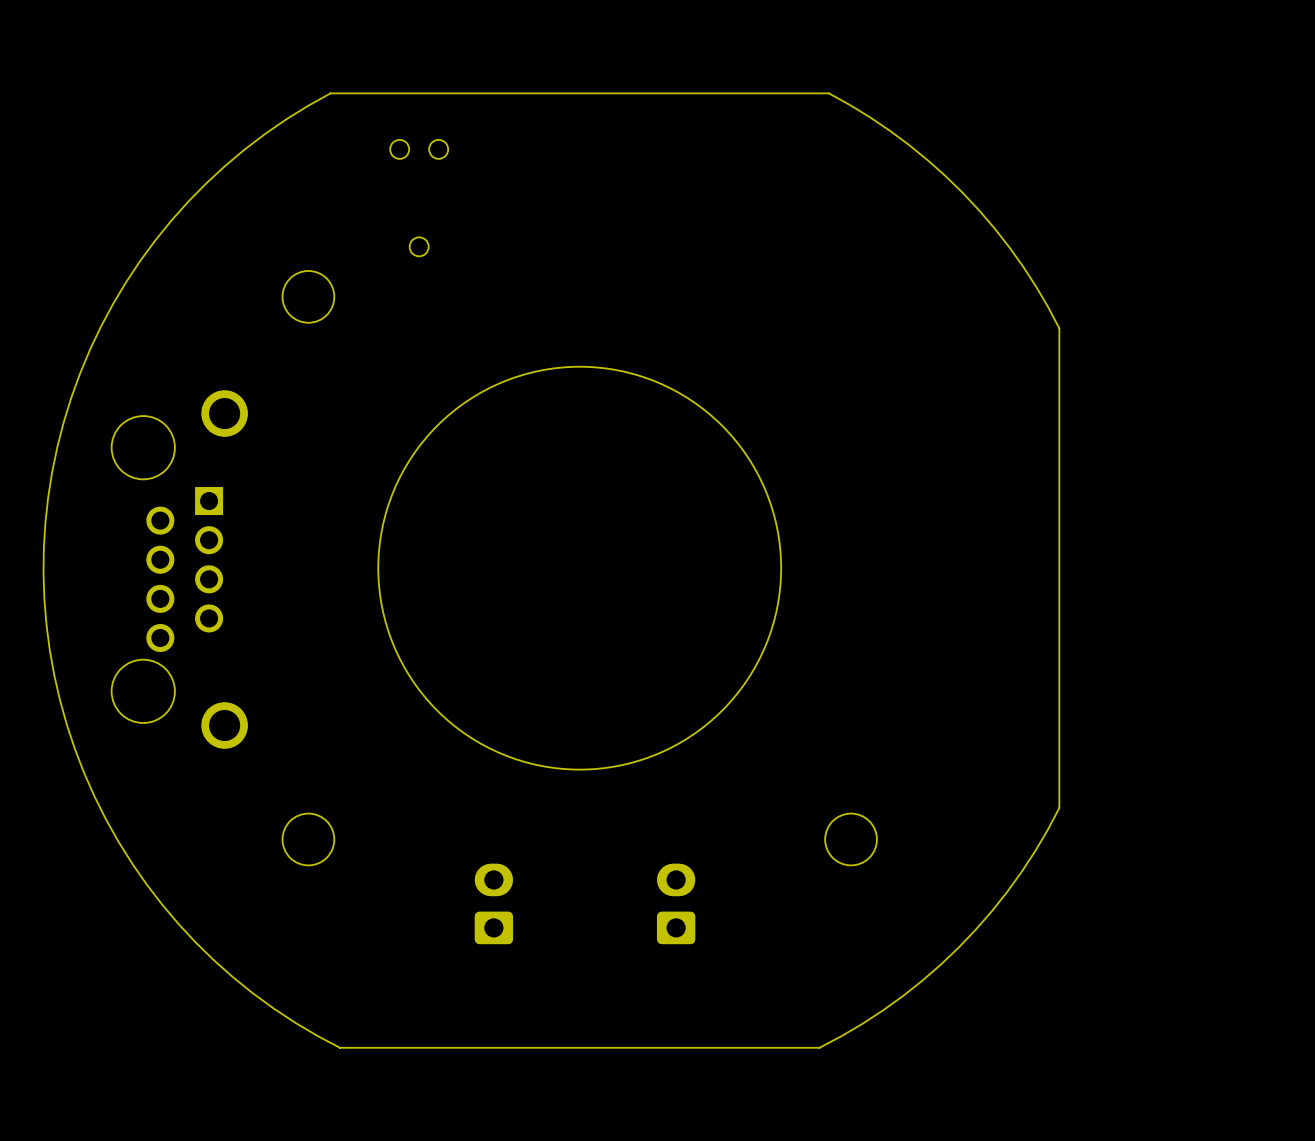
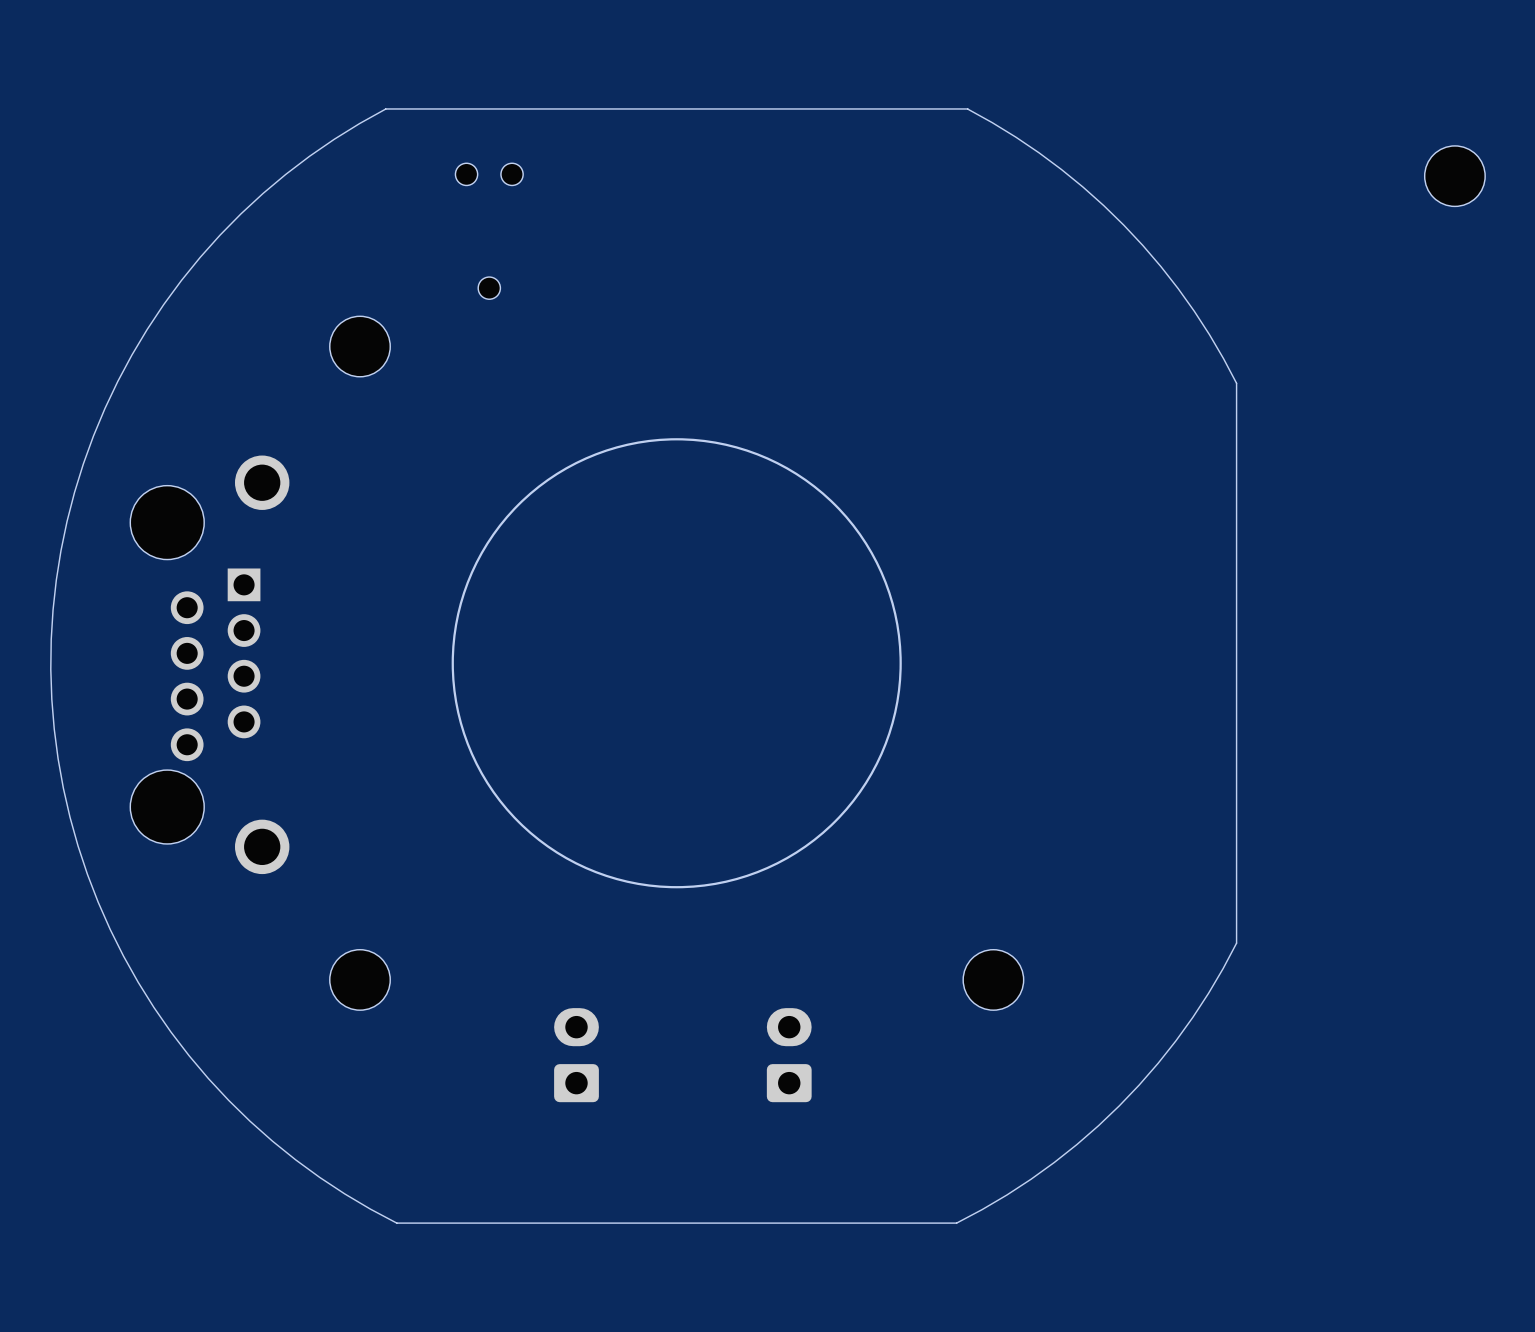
part: none -> (1454, 176)
round board edge size: [377, 366, 782, 771] -> [451, 438, 902, 889]

